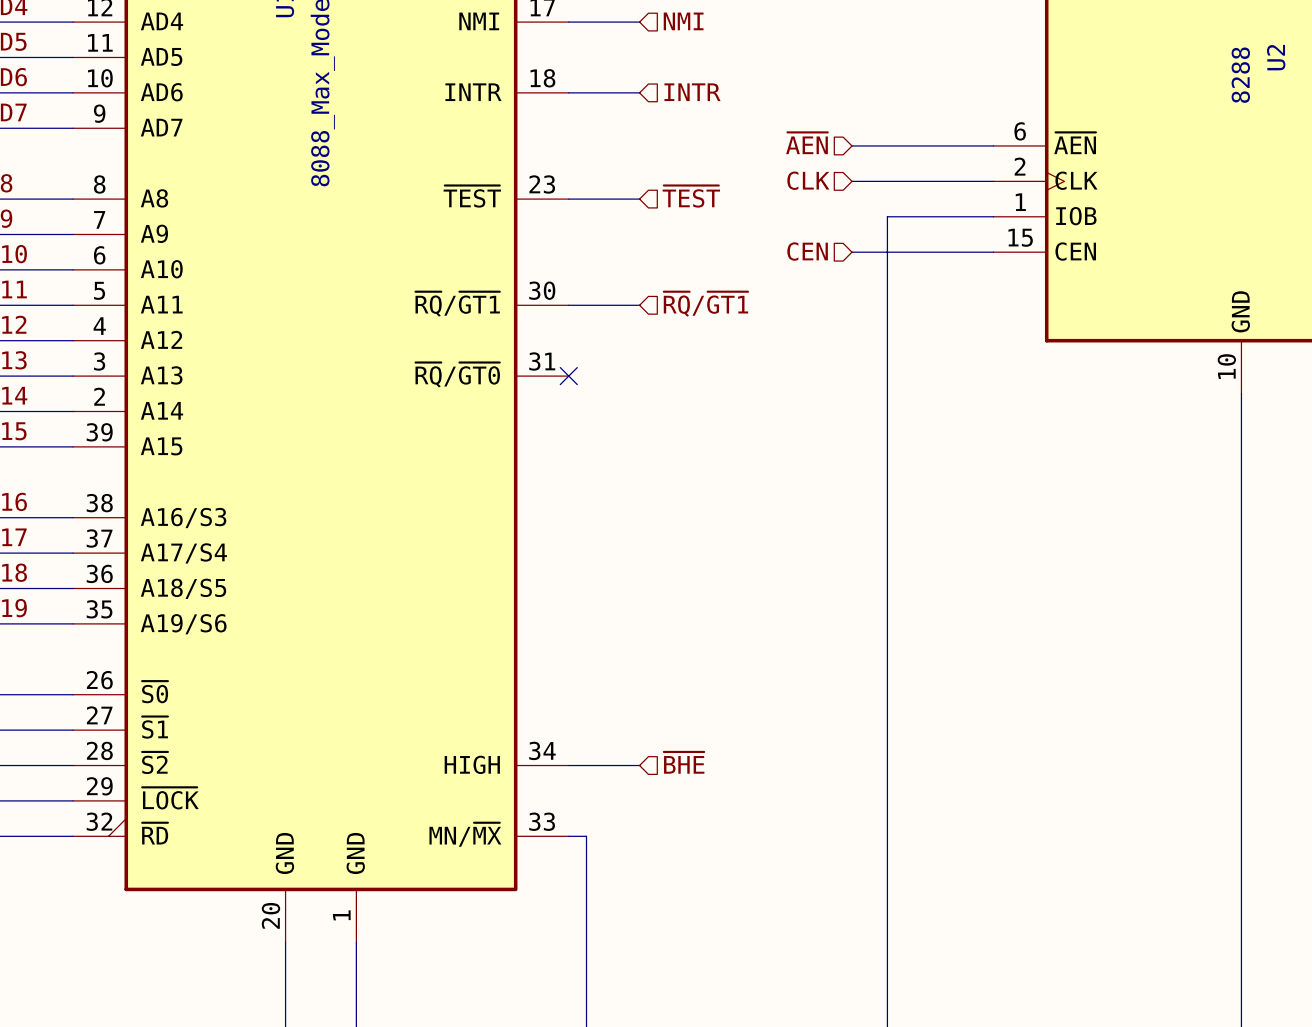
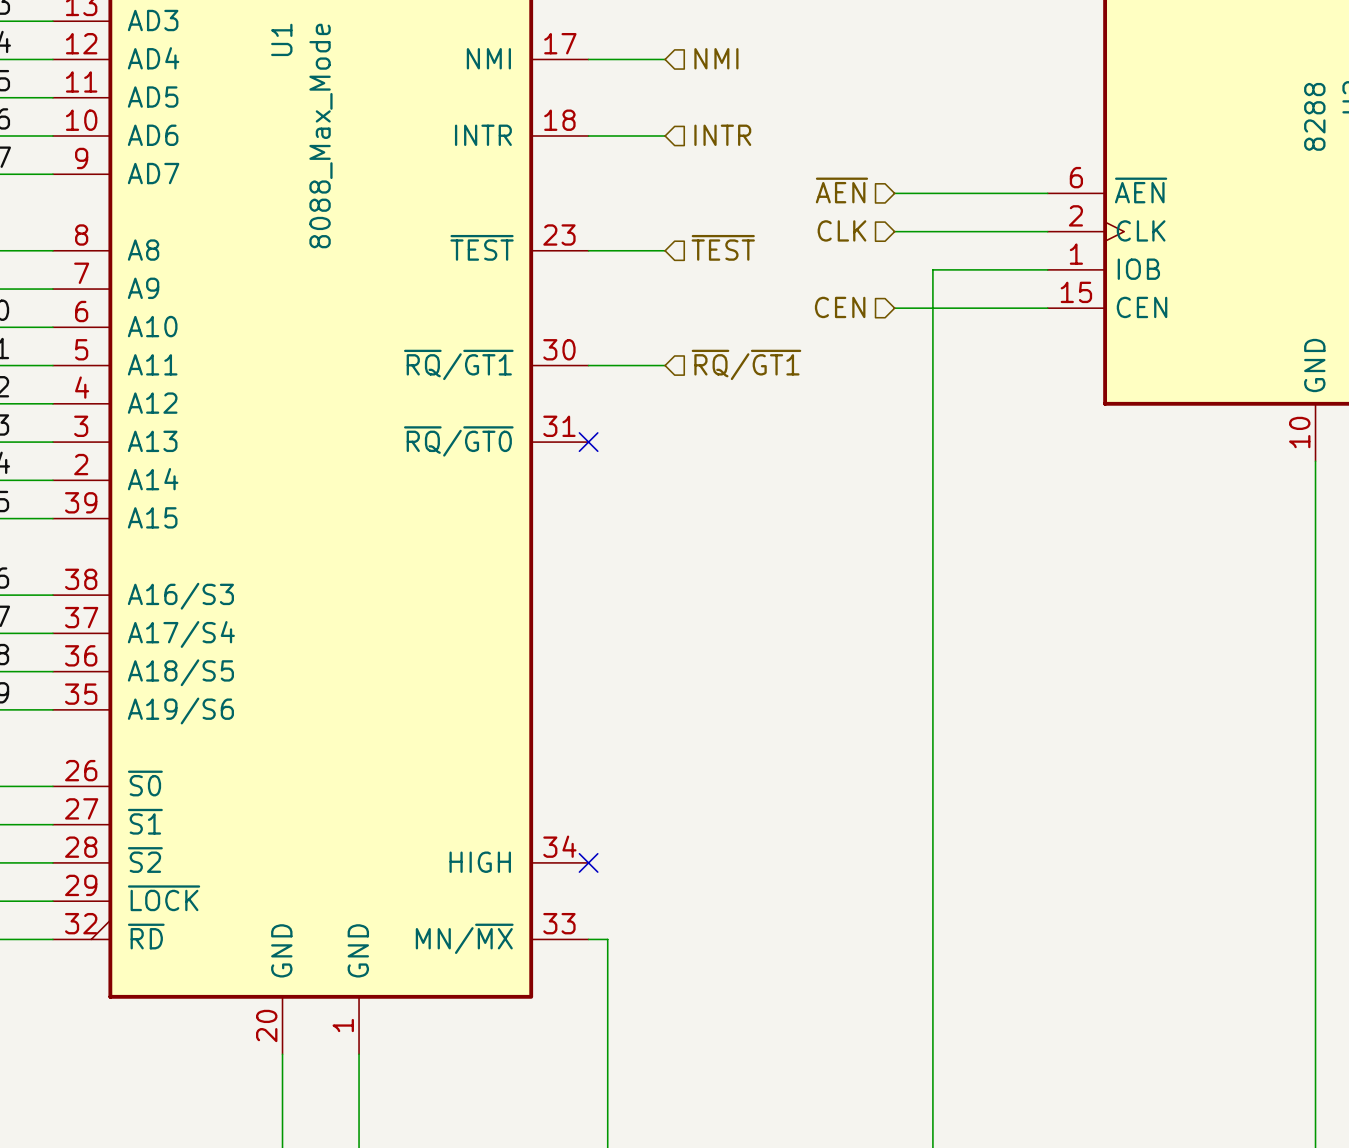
hierarchical label: ~{BHE} (684, 762) -> none
wire: (568, 765) (639, 765) -> none
no-connect mark: none -> (588, 862)

